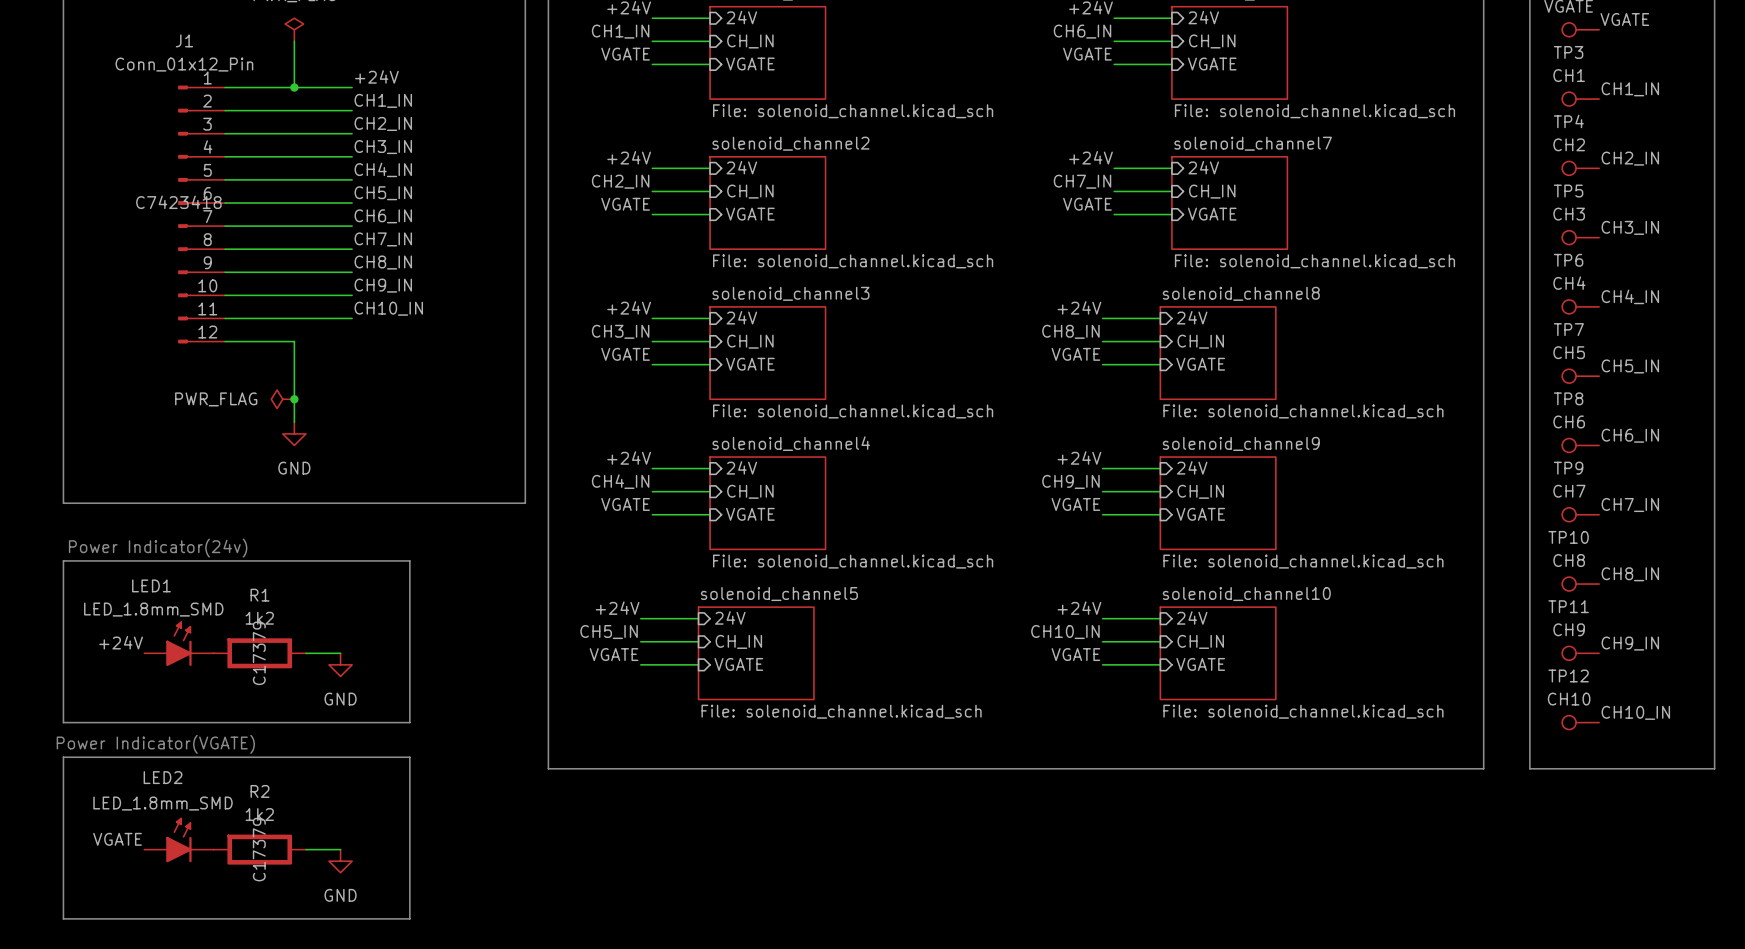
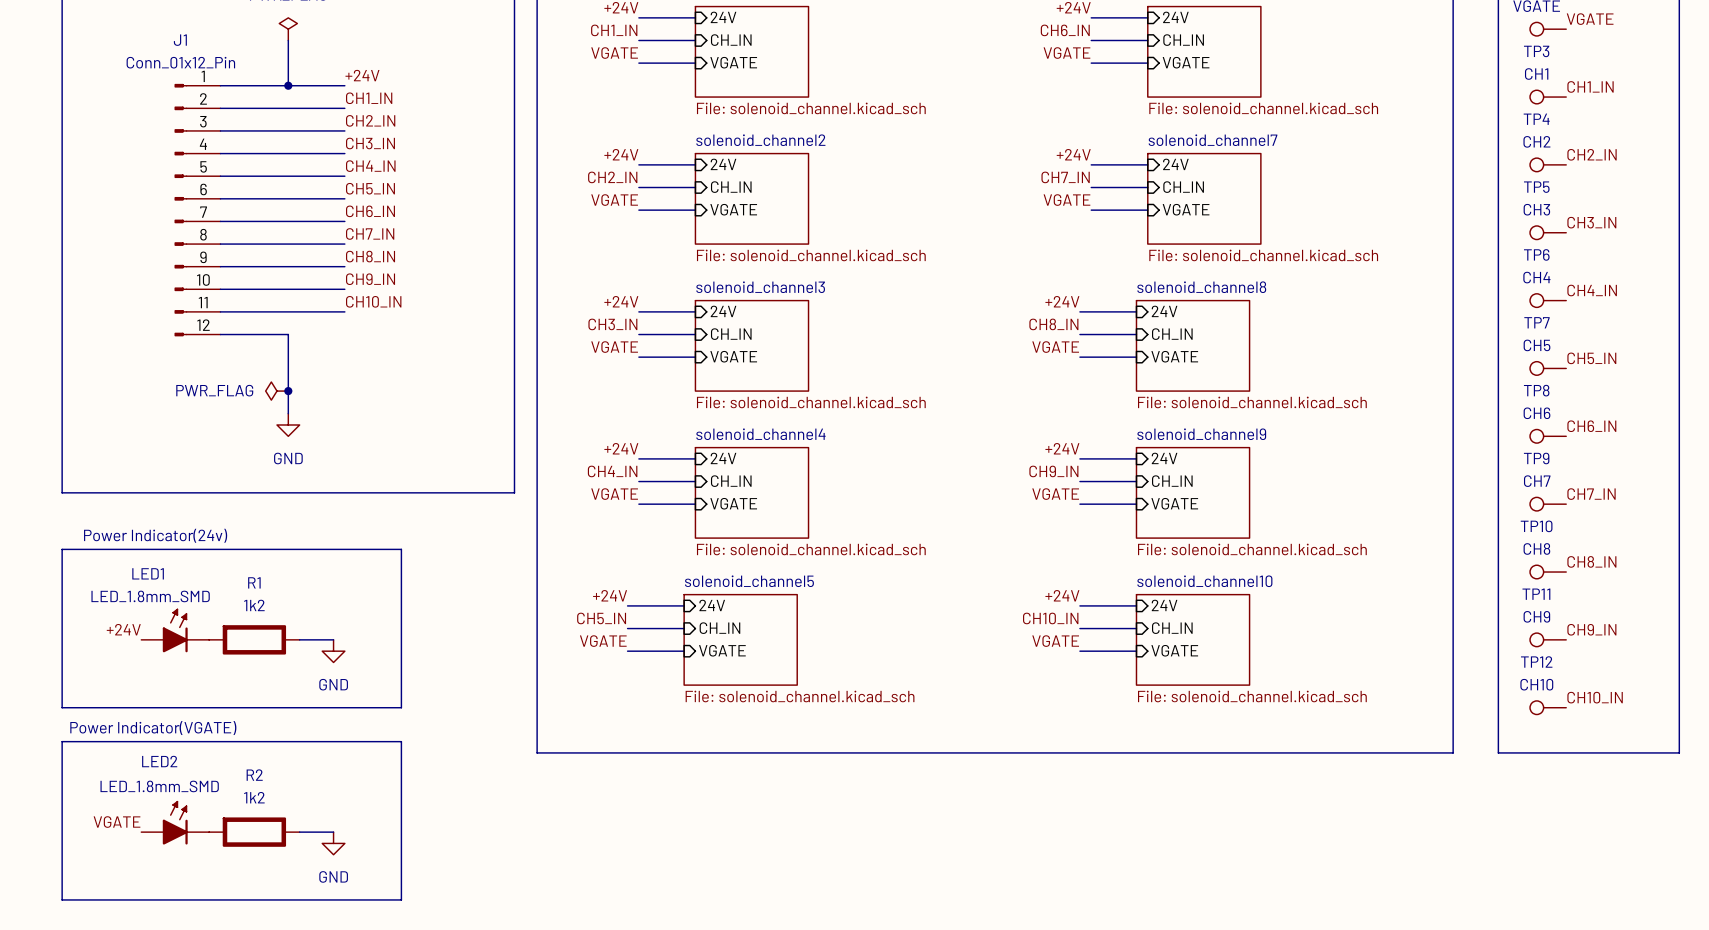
J1 text: C7423418 (178, 202) -> none
R1 text: C17379 (259, 653) -> none
R2 text: C17379 (259, 849) -> none

